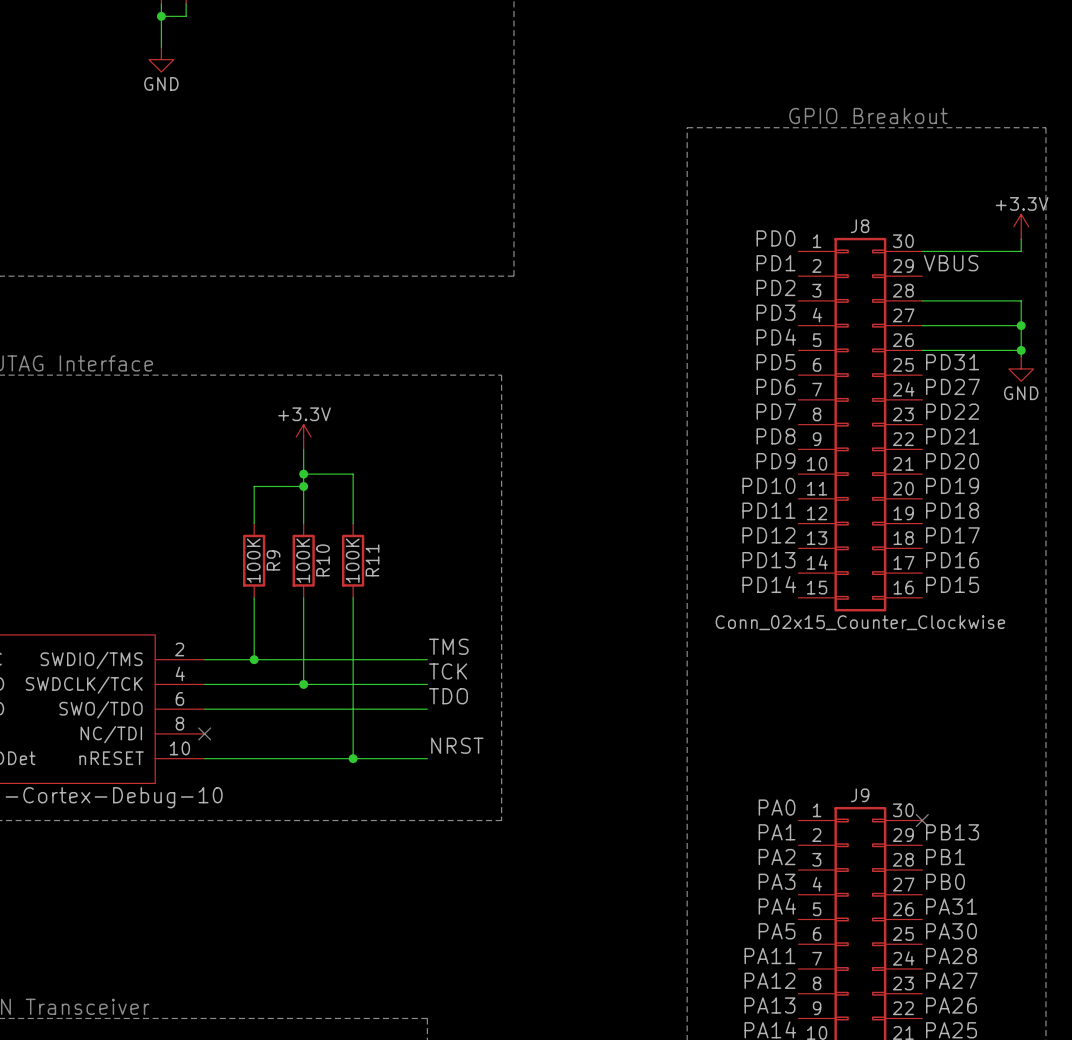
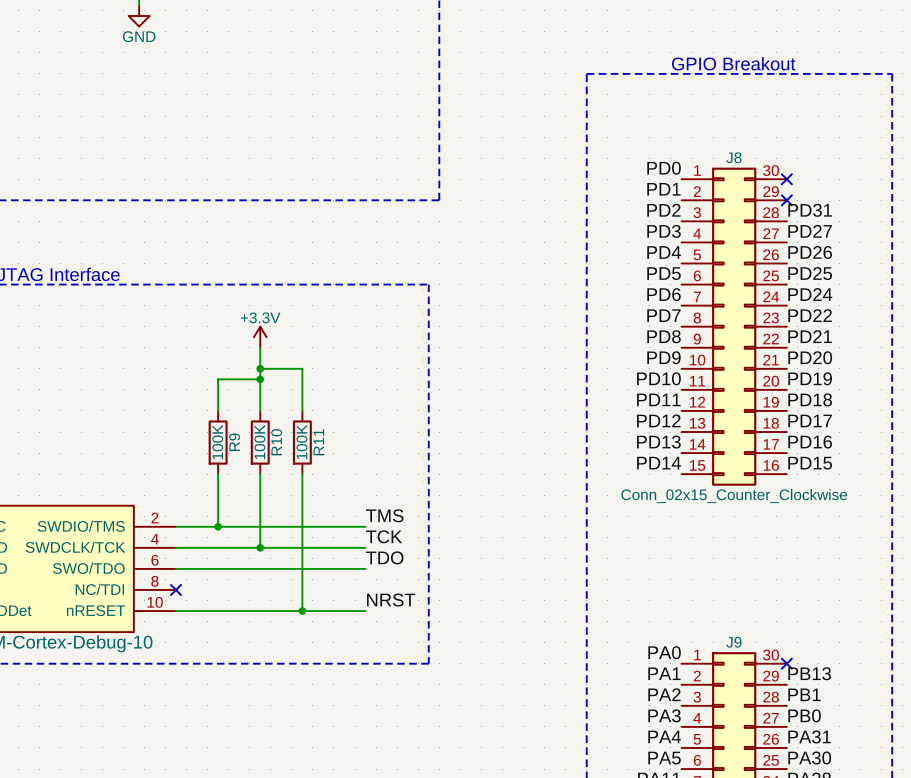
power symbol: +3.3V (1021, 226) -> none
wire: (1021, 239) (1021, 251) (922, 251) -> none
no-connect mark: none -> (786, 179)
label: VBUS (951, 263) -> none
no-connect mark: none -> (786, 200)
label: none -> PD31 (810, 210)
wire: (922, 300) (1021, 300) (1021, 356) -> none
label: none -> PD27 (810, 231)
wire: (922, 325) (1021, 325) -> none
junction: (1021, 325) -> none
label: none -> PD26 (810, 252)
wire: (922, 350) (1021, 350) -> none
junction: (1021, 350) -> none
label: PD31 (952, 362) -> PD25 (810, 273)
power symbol: GND (1021, 368) -> none
label: PD27 (952, 386) -> PD24 (810, 294)

